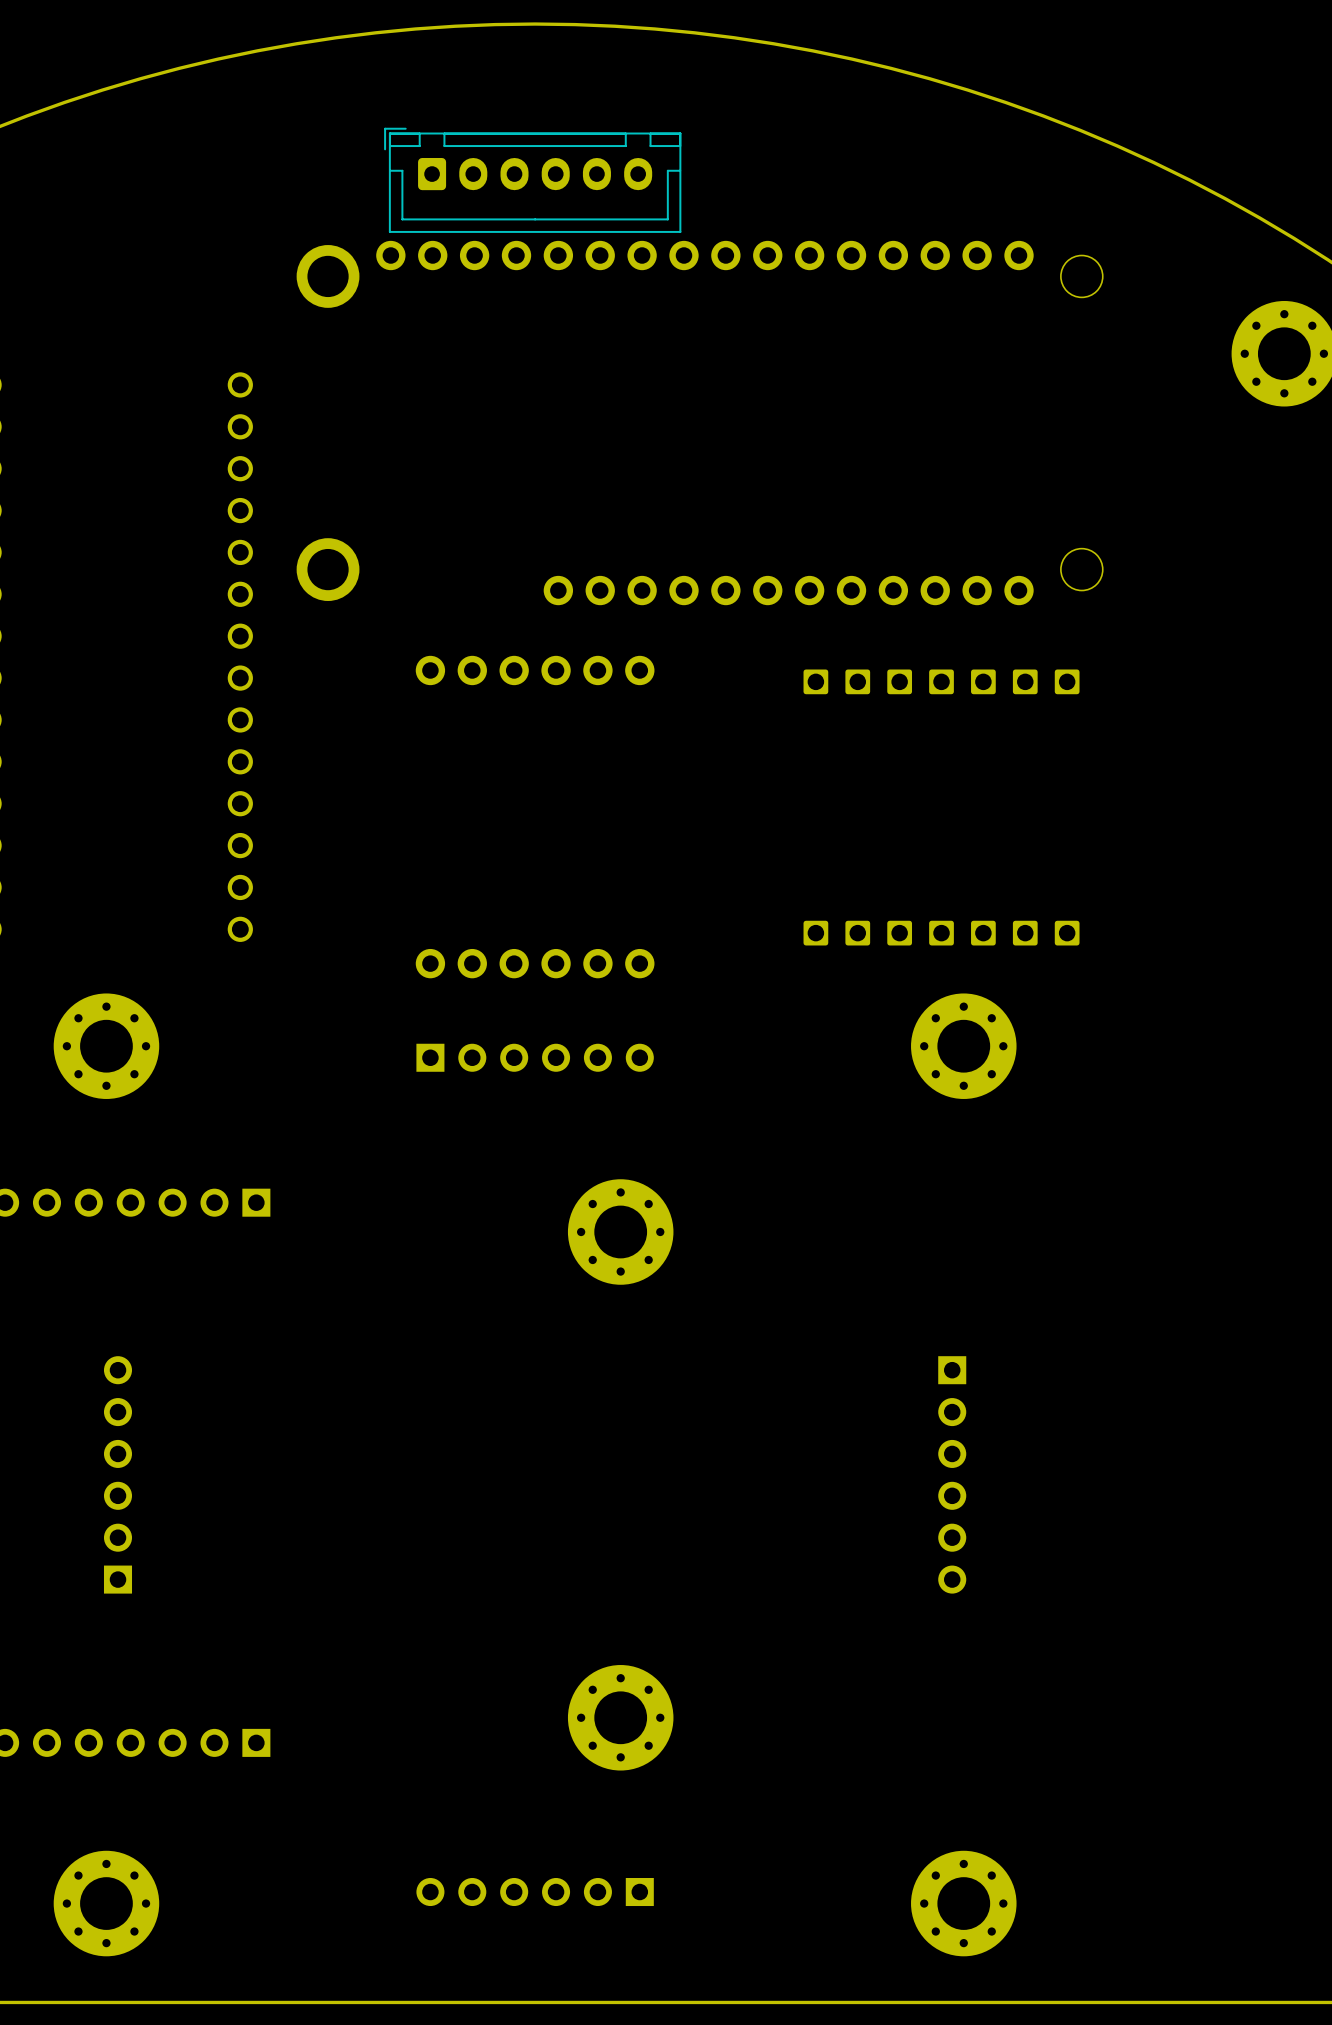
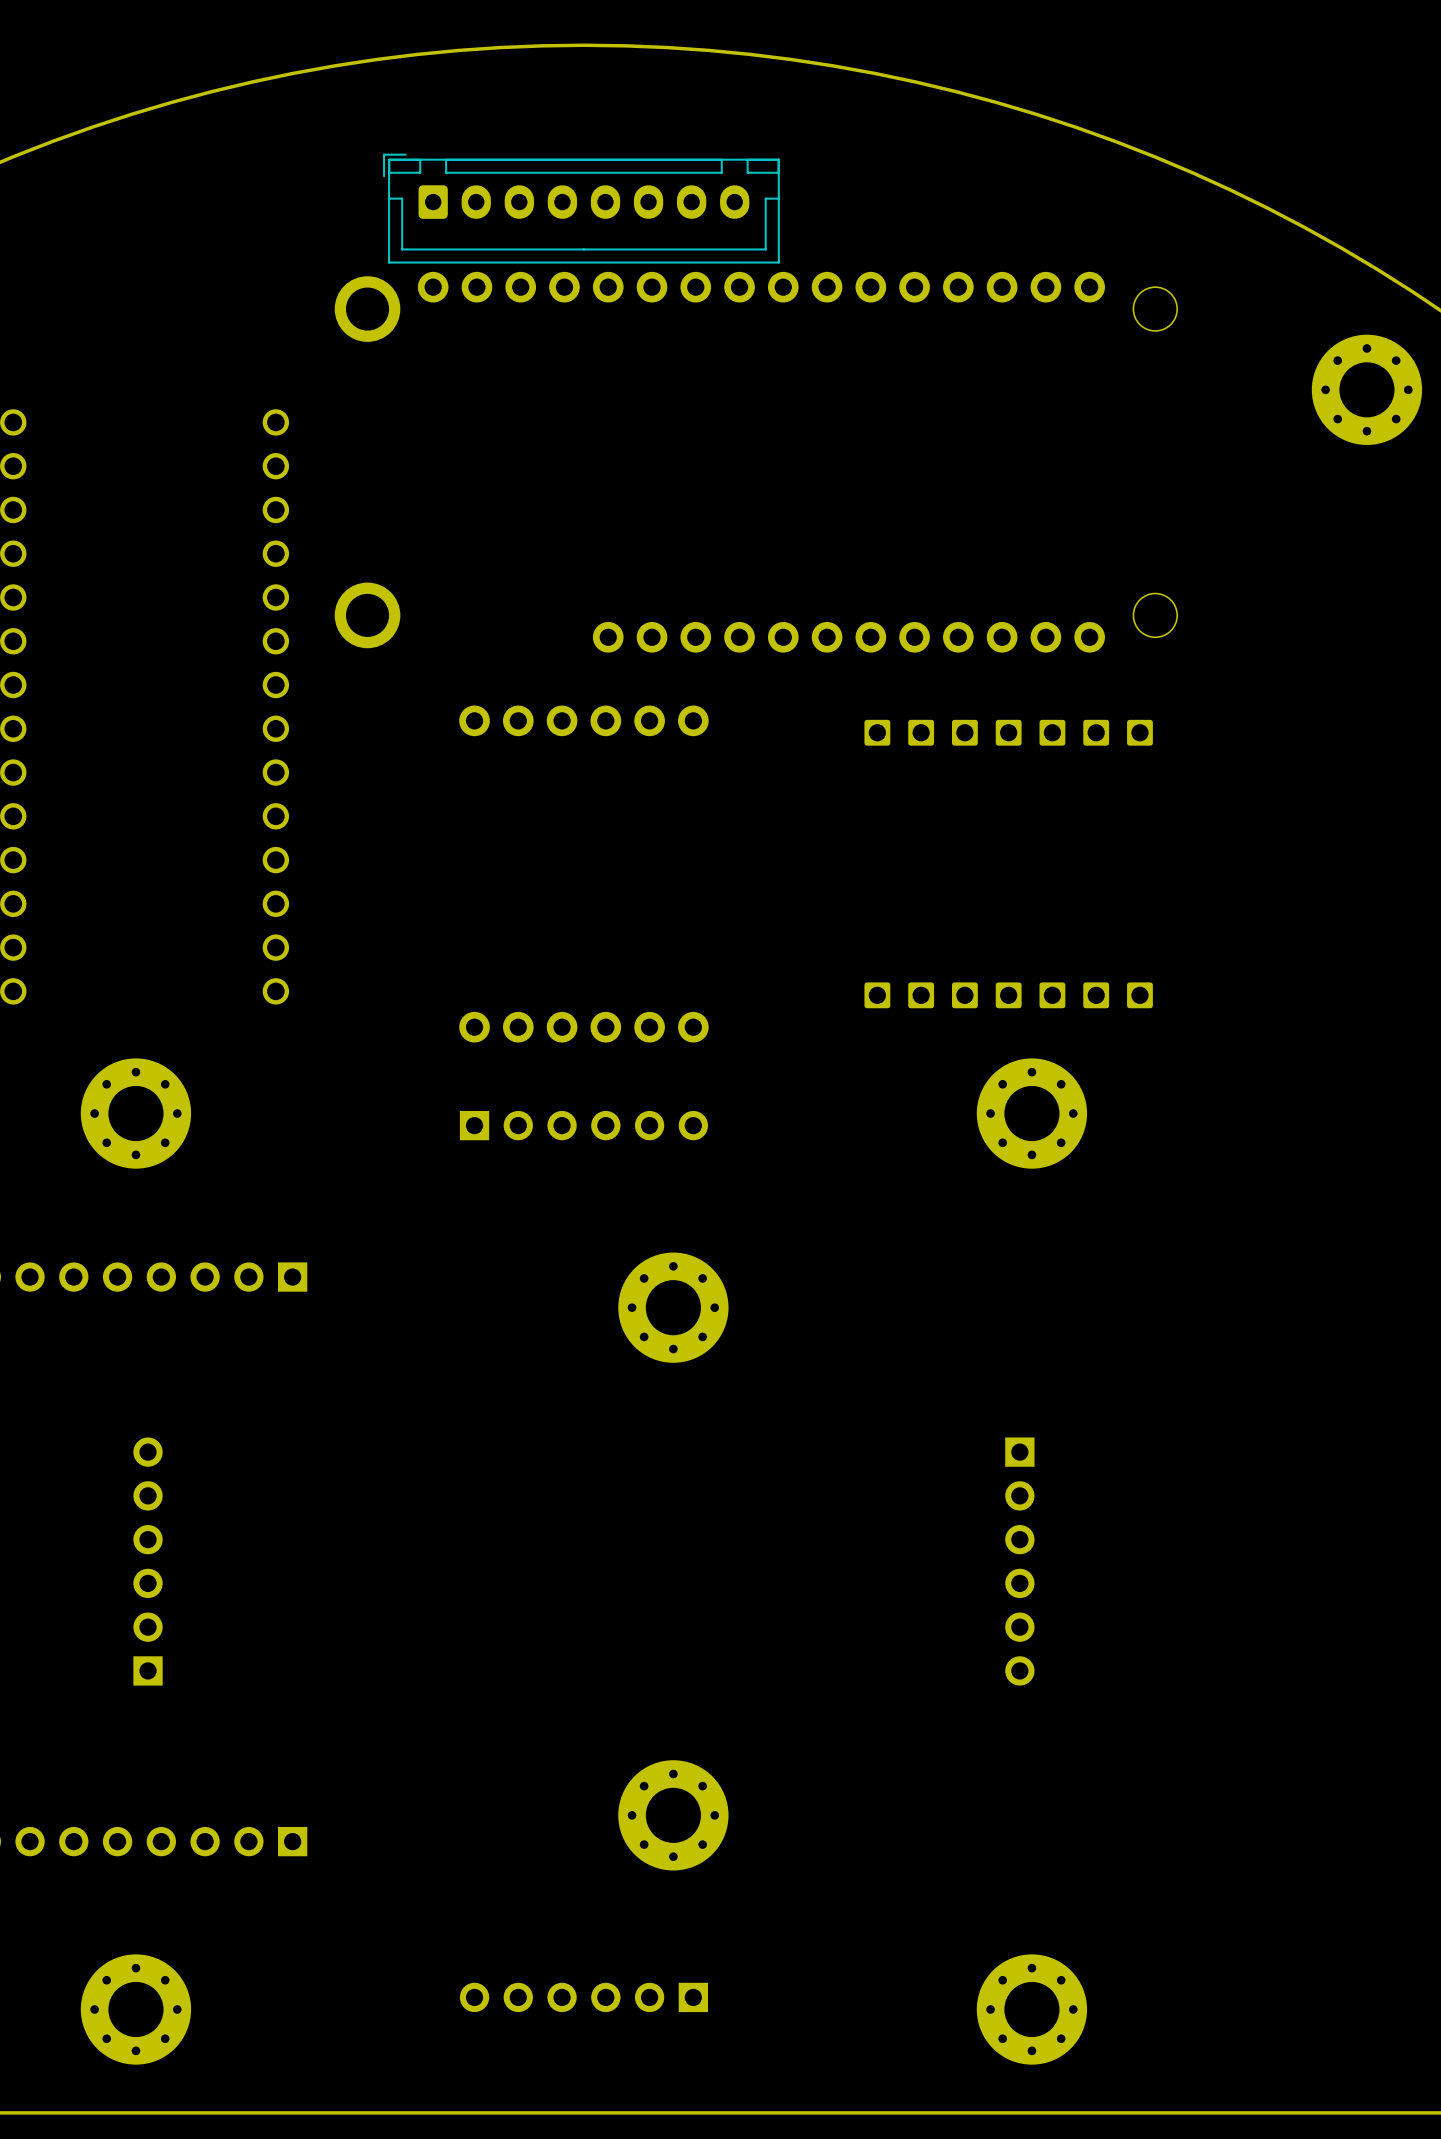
part footprint: [384, 127, 682, 233] -> [383, 153, 780, 264]

